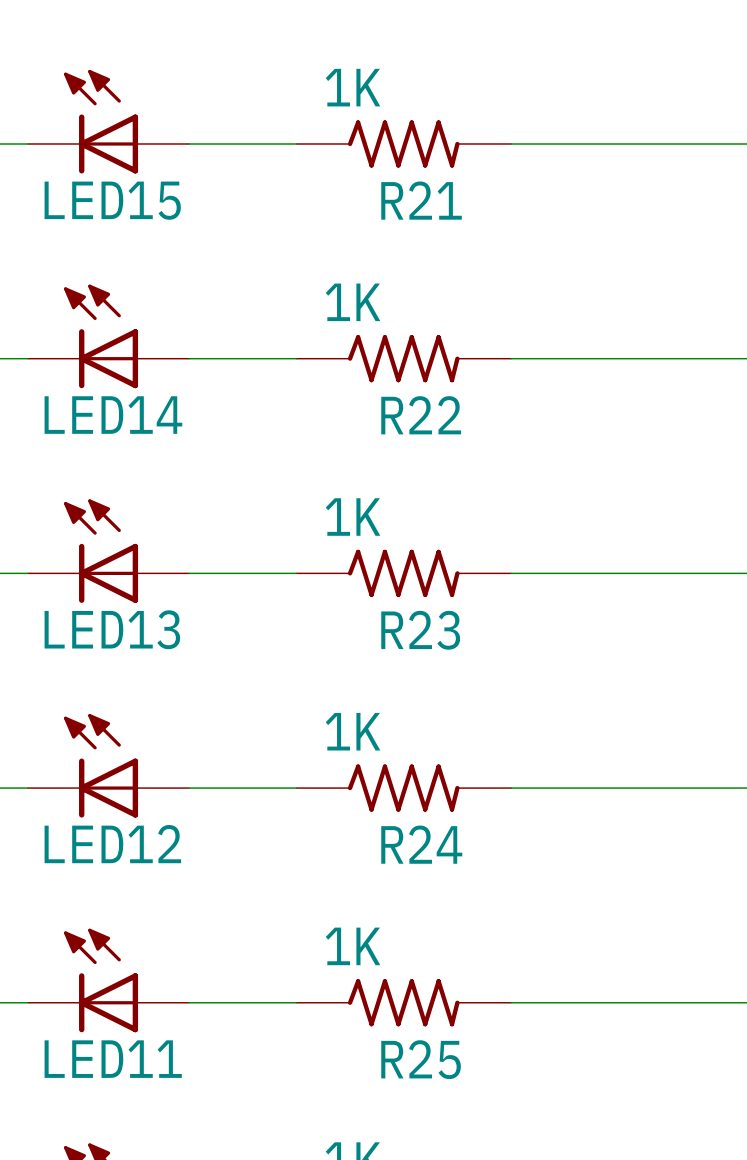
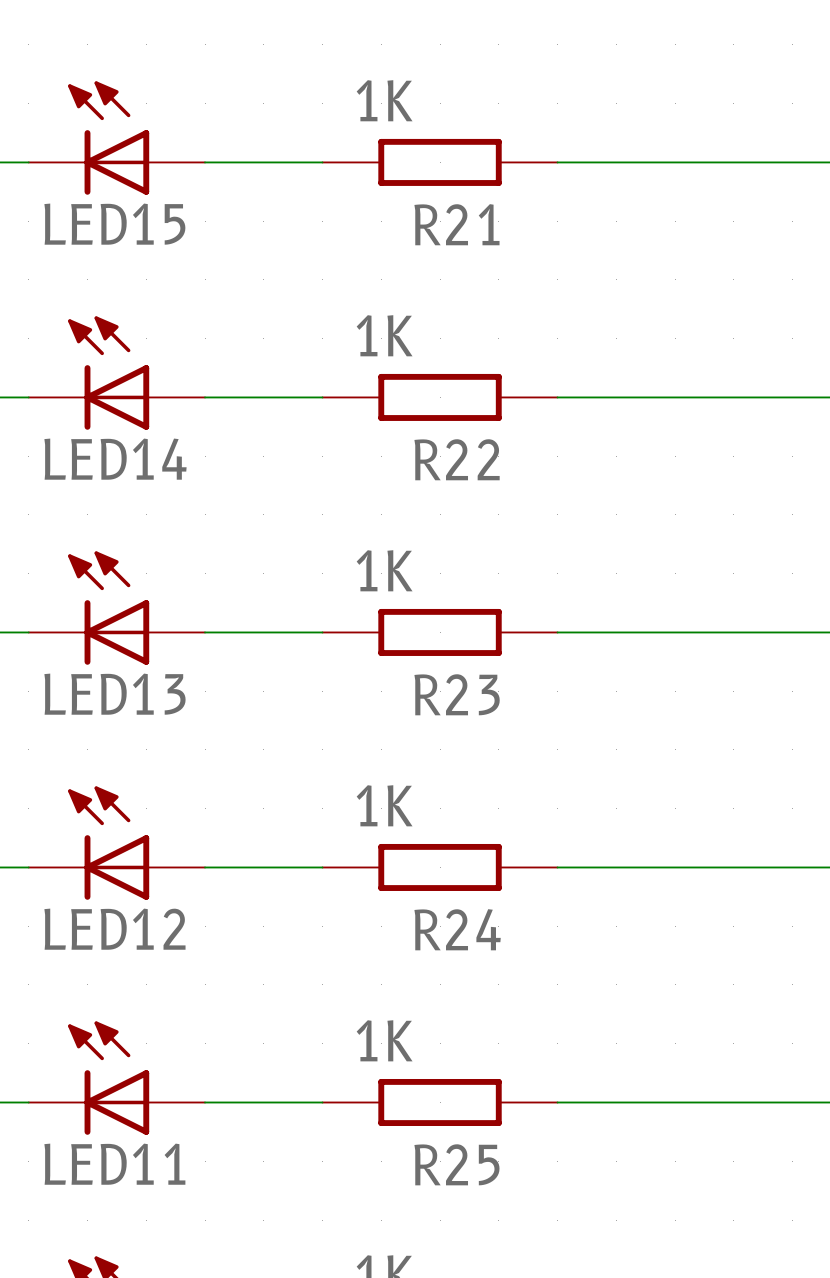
R21 symbol: [296, 120, 512, 168] -> [322, 138, 558, 186]
R22 symbol: [296, 335, 512, 383] -> [322, 373, 558, 421]
R23 symbol: [296, 549, 512, 597] -> [322, 608, 558, 656]
R24 symbol: [296, 764, 512, 812] -> [322, 843, 558, 891]
R25 symbol: [296, 979, 512, 1027] -> [322, 1078, 558, 1126]

